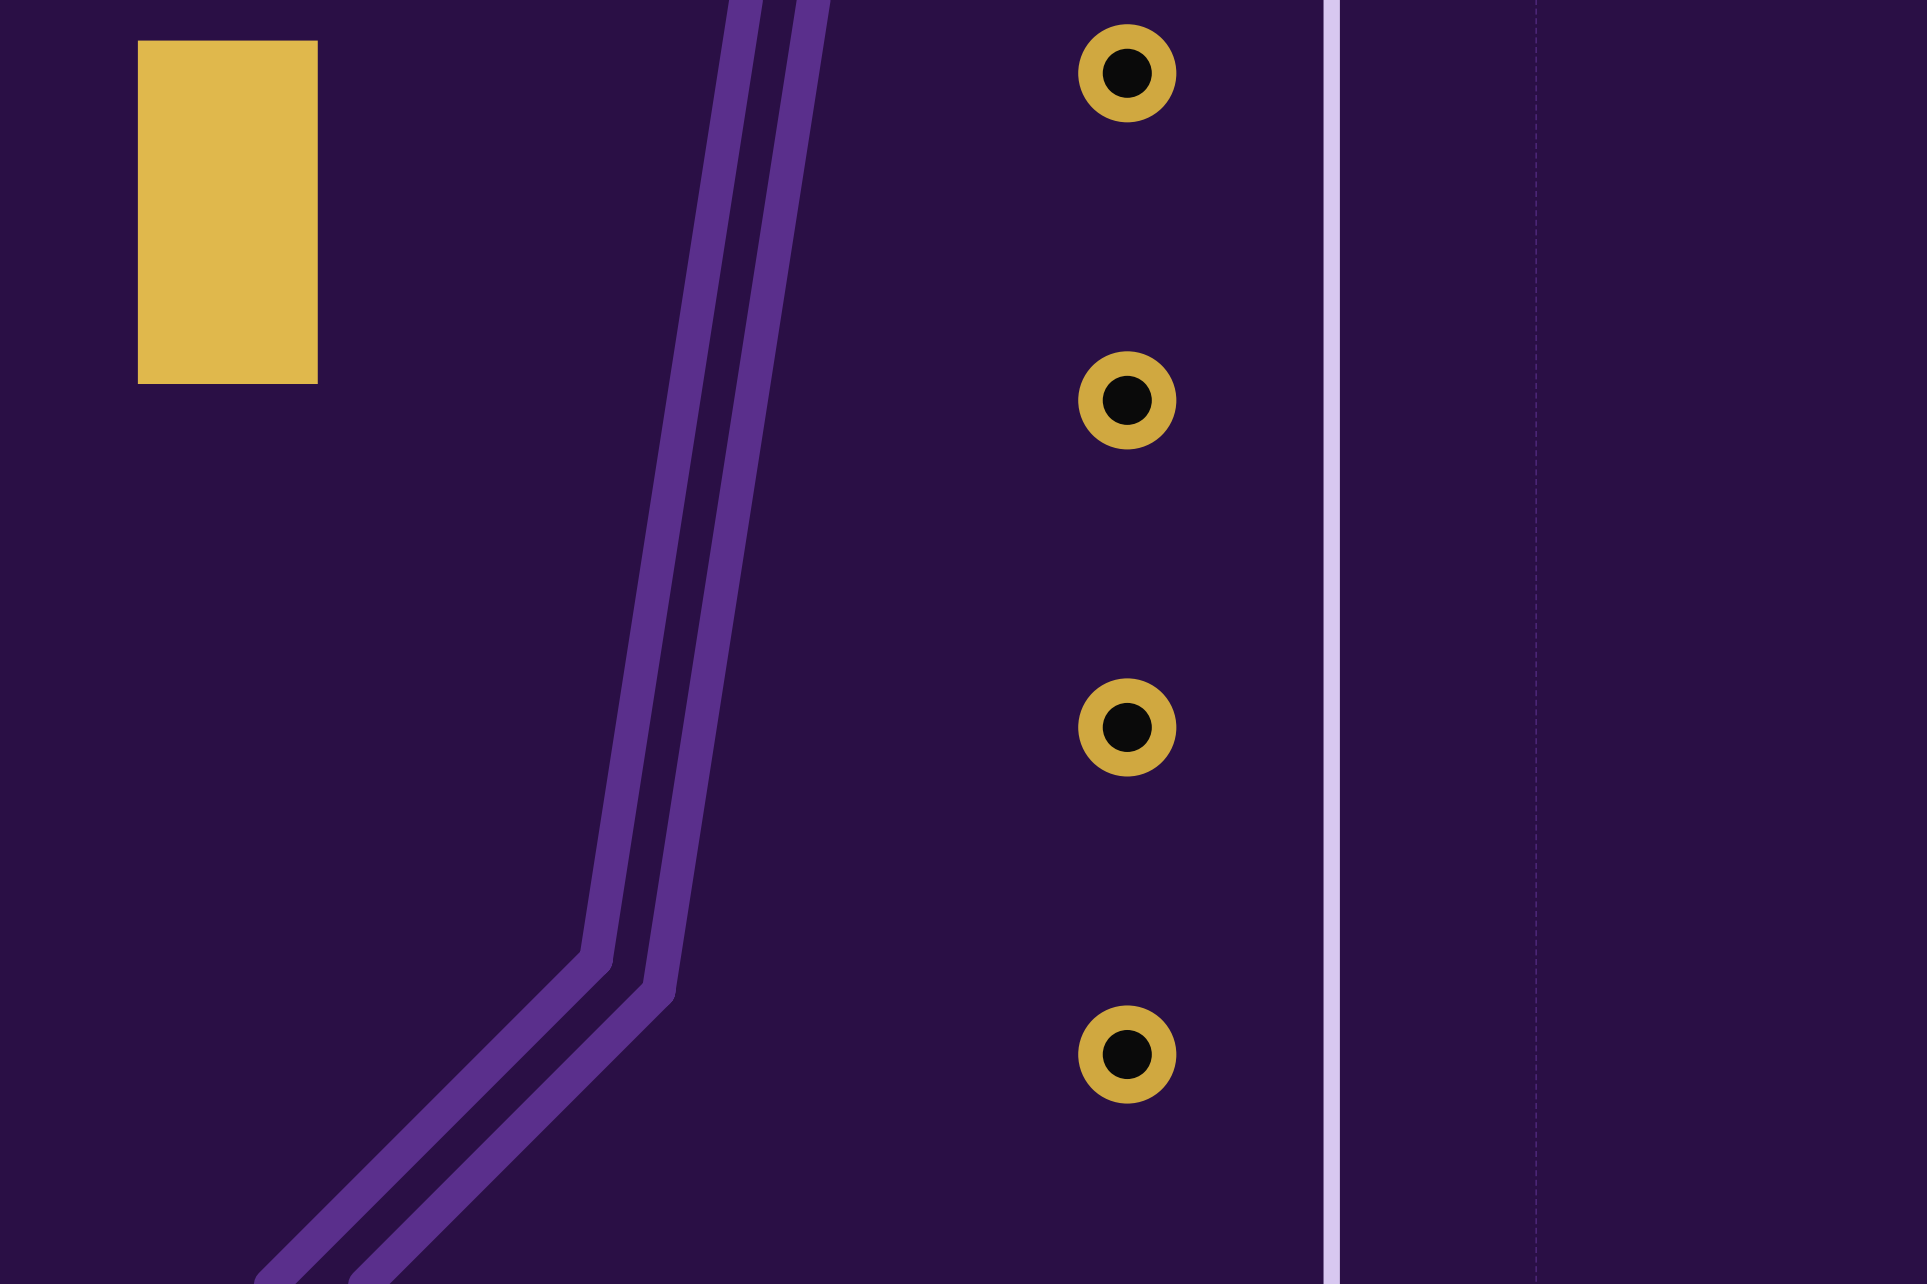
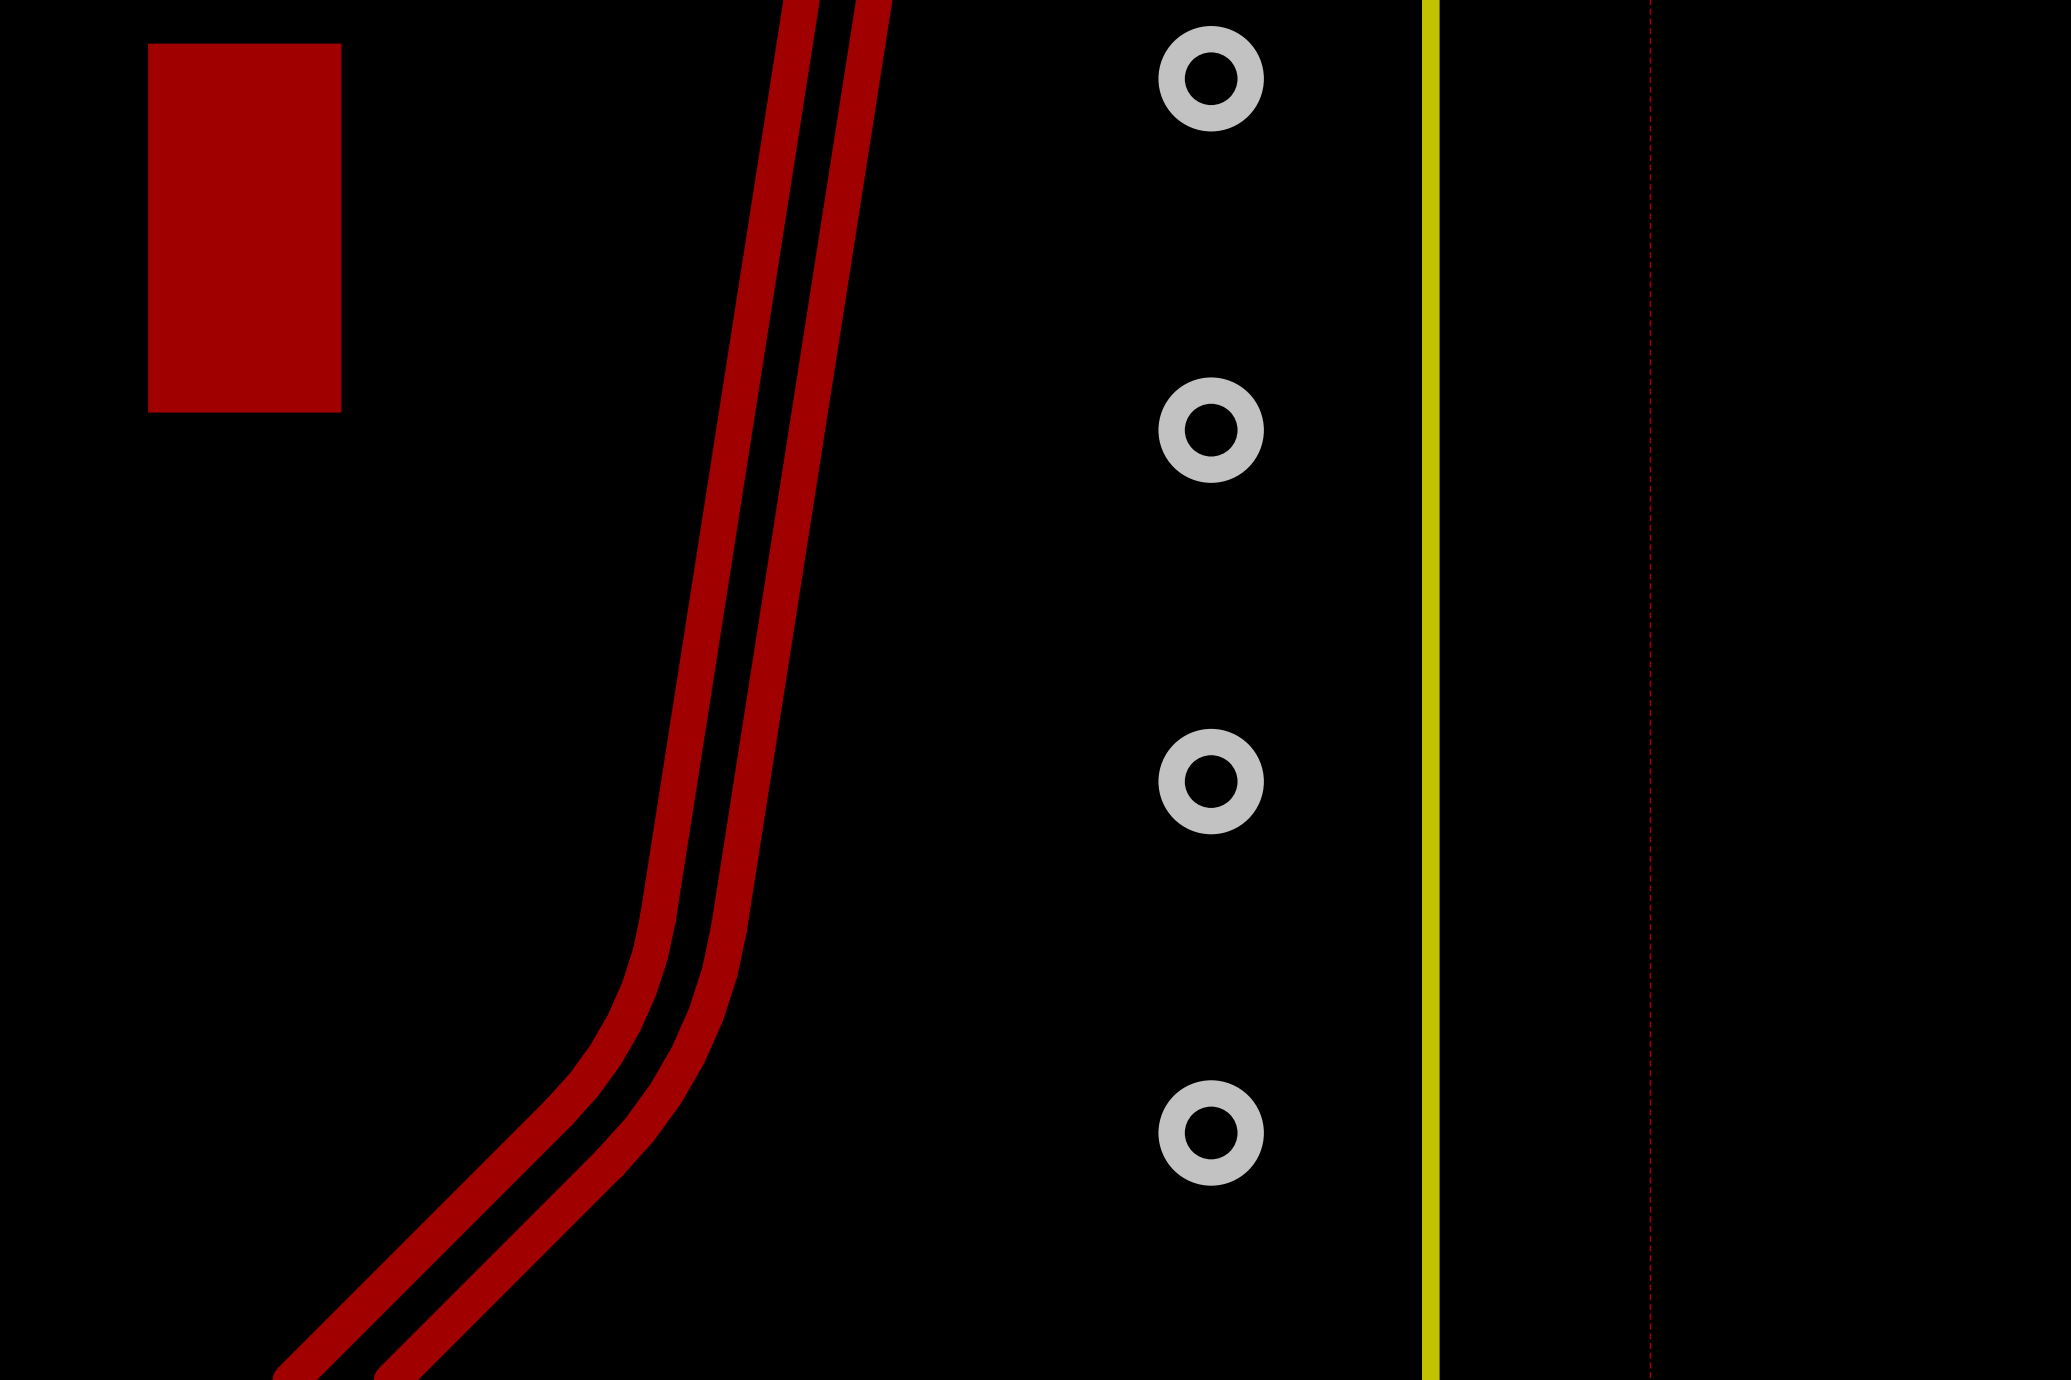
track: (612, 854) (595, 959) (520, 1035) -> (657, 917) (650, 954) (639, 989) (624, 1022) (605, 1054) (583, 1084) (559, 1112)
track: (678, 864) (658, 991) (567, 1081) -> (728, 928) (719, 972) (706, 1014) (688, 1055) (665, 1093) (639, 1129) (610, 1162)

